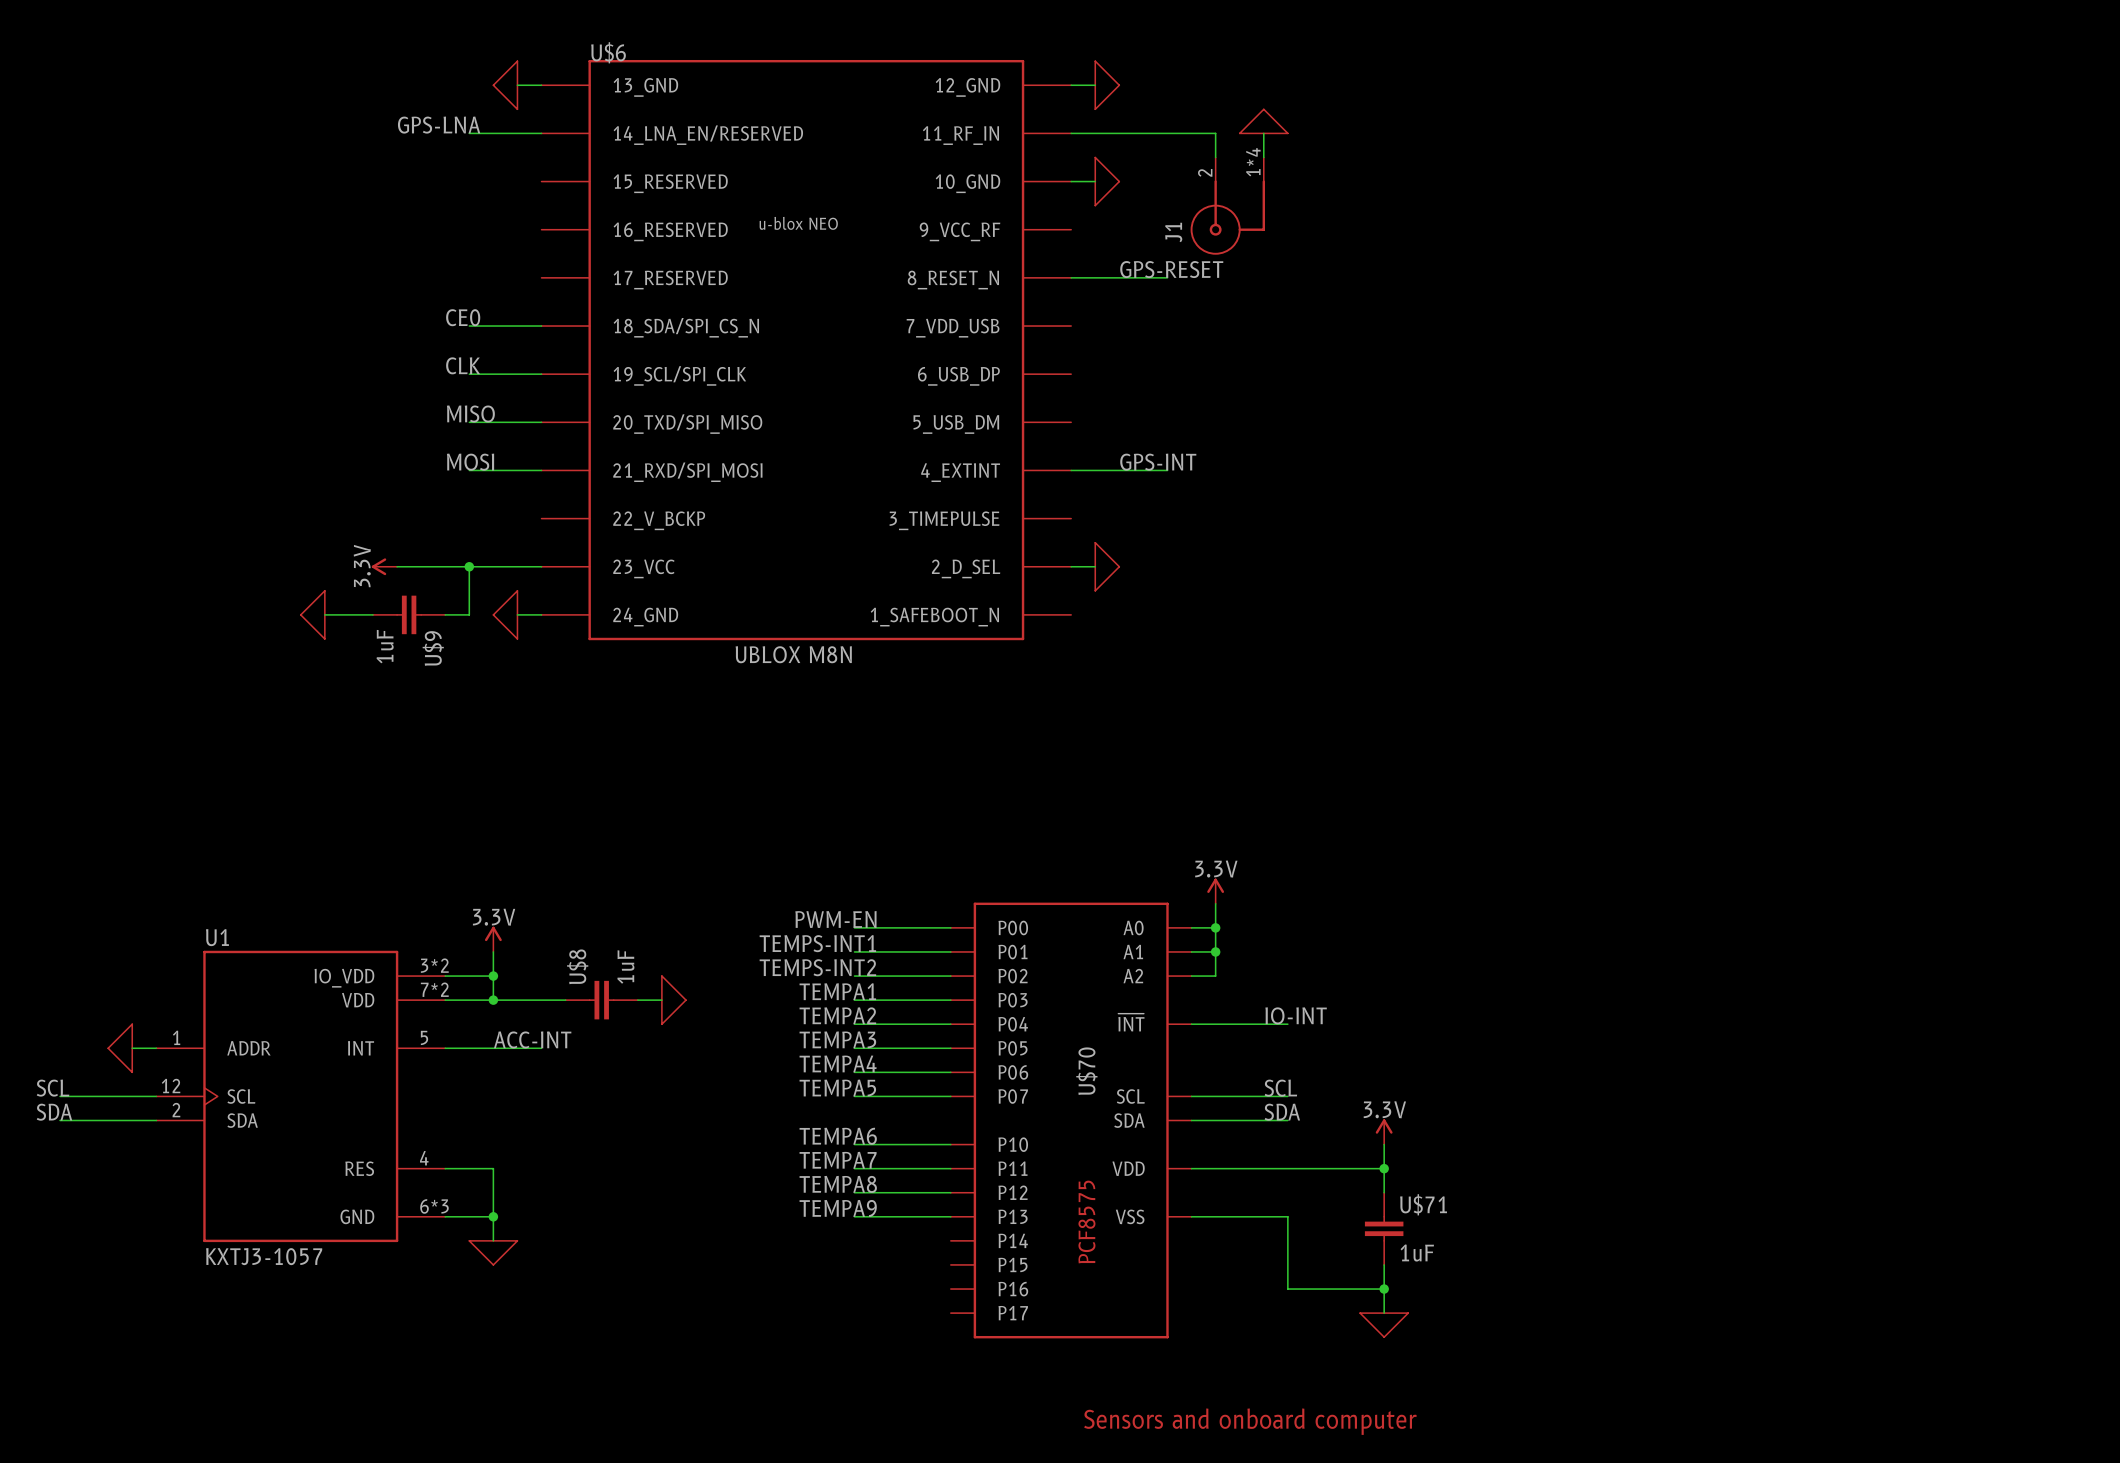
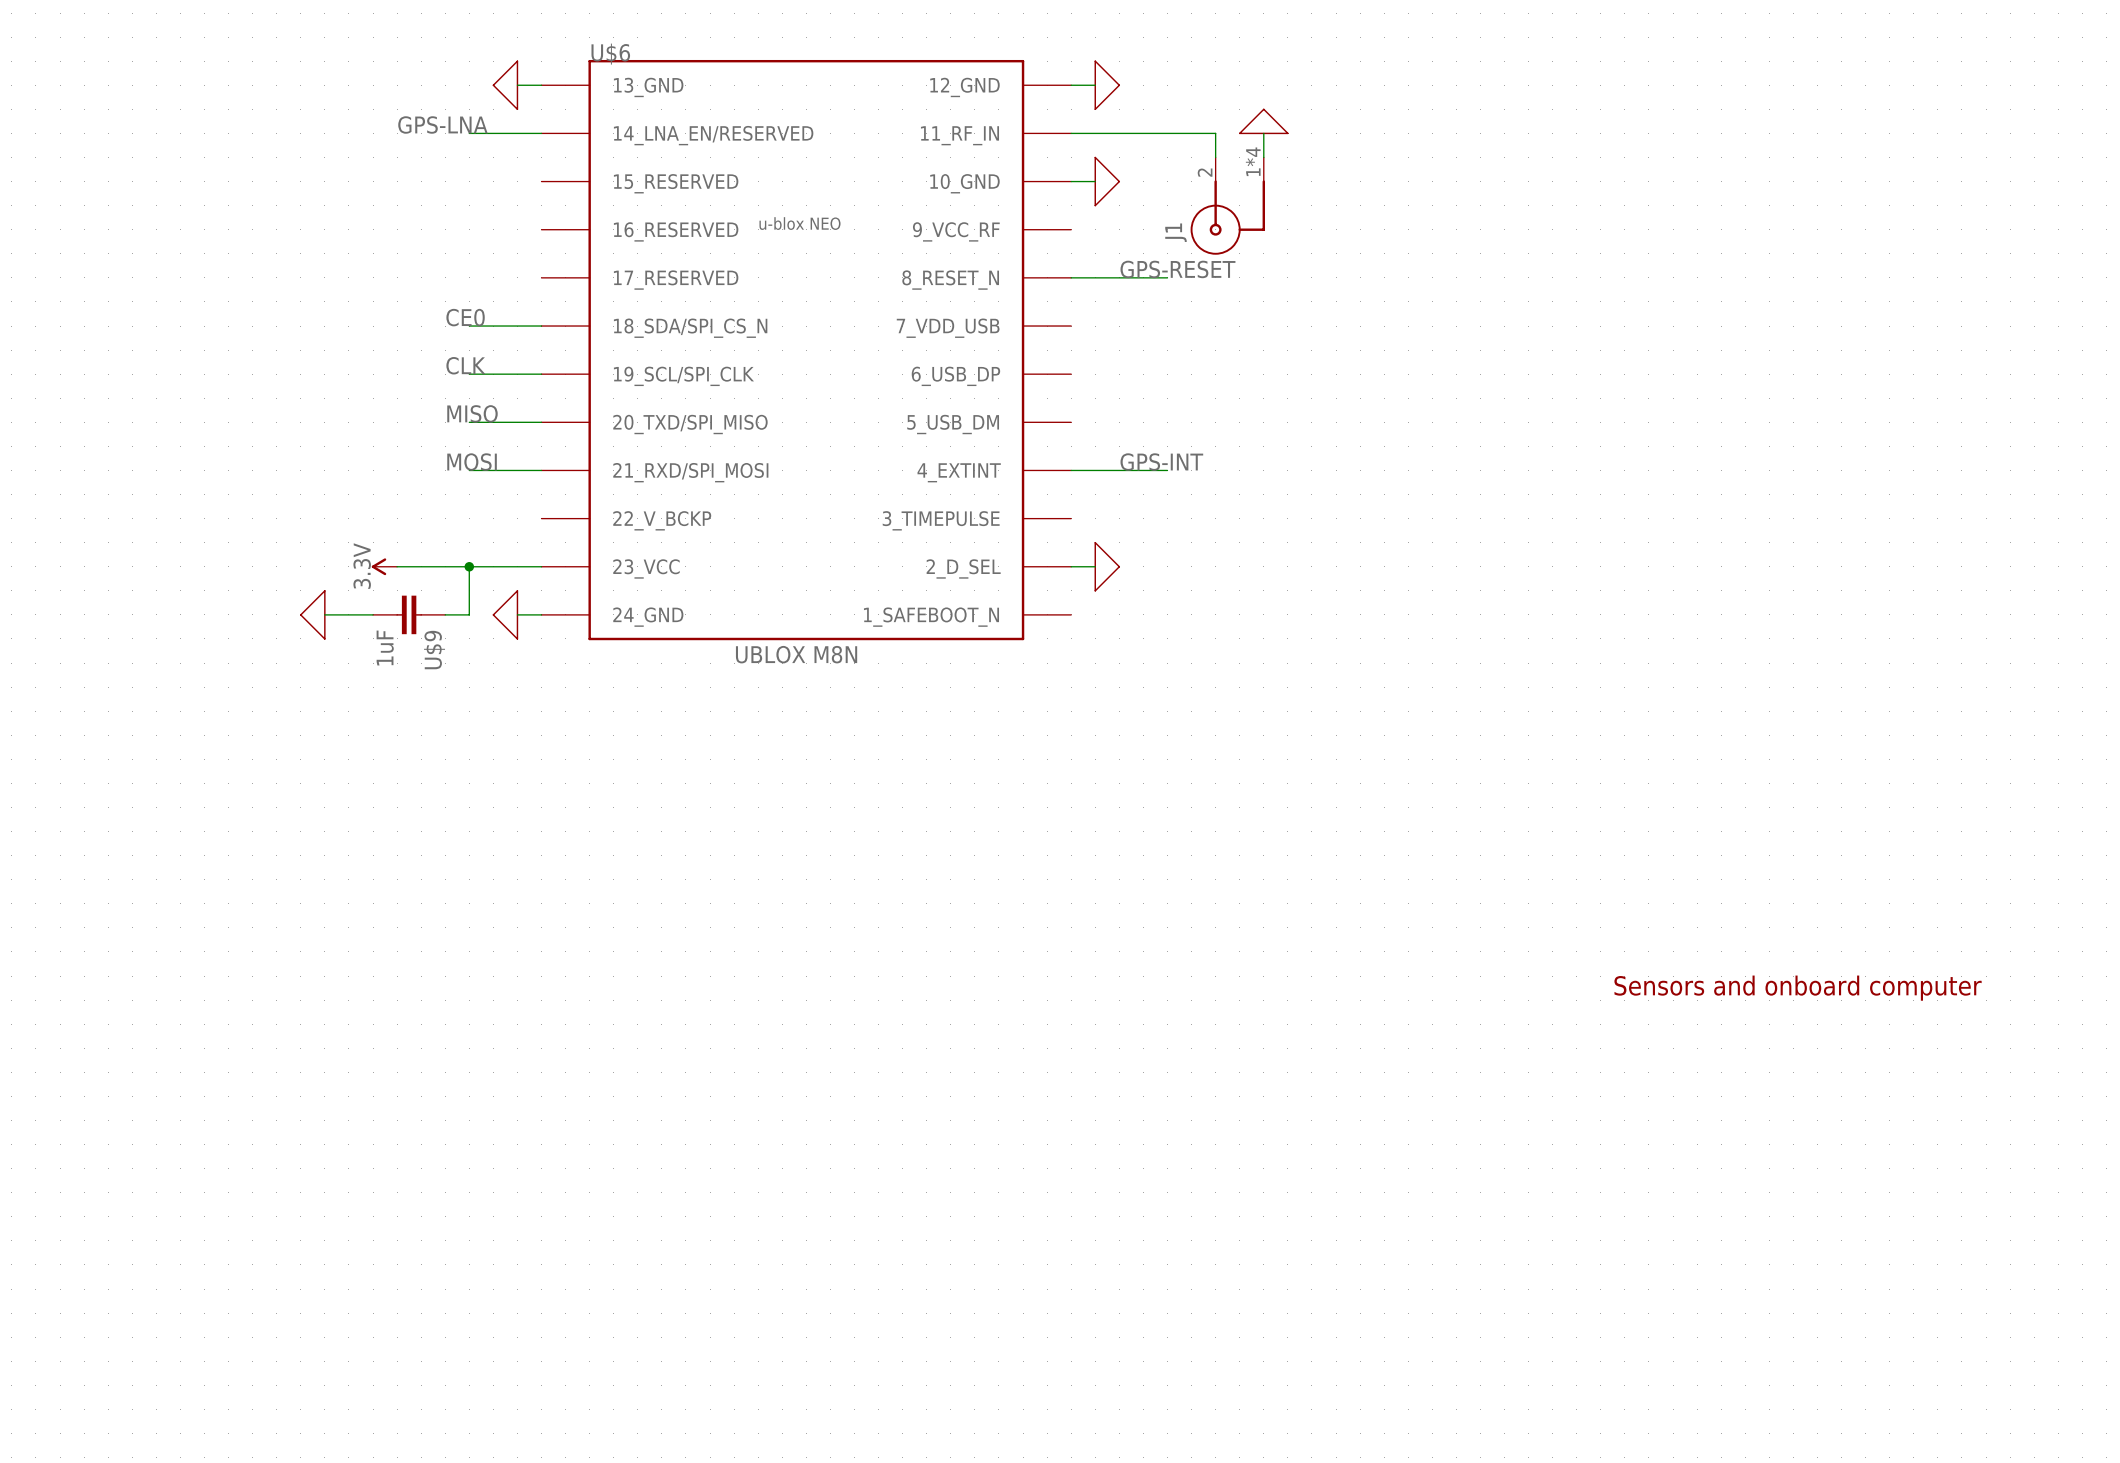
power symbol: 3.3V (1215, 891) -> none
wire: (1215, 903) (1215, 976) (1191, 976) -> none
label: PWM-EN (835, 919) -> none
wire: (854, 927) (950, 927) -> none
wire: (1191, 927) (1215, 927) -> none
junction: (1215, 927) -> none
power symbol: 3.3V (493, 939) -> none
label: TEMPS-INT1 (817, 943) -> none
wire: (493, 951) (493, 1000) -> none
wire: (854, 951) (950, 951) -> none
wire: (1191, 951) (1215, 951) -> none
junction: (1215, 951) -> none
label: TEMPS-INT2 (817, 967) -> none
wire: (445, 976) (493, 976) -> none
junction: (493, 976) -> none
wire: (854, 976) (950, 976) -> none
text: none -> Sensors and onboard computer (1798, 988)
label: TEMPA1 (837, 991) -> none
wire: (445, 1000) (565, 1000) -> none
junction: (493, 1000) -> none
U$8: 1uF (601, 1000) -> none
wire: (637, 1000) (661, 1000) -> none
power symbol: (673, 1000) -> none
wire: (854, 1000) (950, 1000) -> none
label: TEMPA2 (837, 1015) -> none
label: IO-INT (1296, 1015) -> none
wire: (854, 1024) (950, 1024) -> none
wire: (1191, 1024) (1287, 1024) -> none
label: ACC-INT (532, 1039) -> none
label: TEMPA3 (837, 1039) -> none
power symbol: (120, 1048) -> none
wire: (132, 1048) (156, 1048) -> none
wire: (445, 1048) (541, 1048) -> none
wire: (854, 1048) (950, 1048) -> none
label: TEMPA4 (838, 1063) -> none
wire: (854, 1072) (950, 1072) -> none
label: SCL (53, 1088) -> none
label: TEMPA5 (837, 1088) -> none
label: SCL (1280, 1088) -> none
wire: (60, 1096) (156, 1096) -> none
U1: KXTJ3-1057 (300, 1096) -> none
wire: (854, 1096) (950, 1096) -> none
wire: (1191, 1096) (1287, 1096) -> none
label: SDA (54, 1112) -> none
label: SDA (1282, 1112) -> none
wire: (60, 1120) (156, 1120) -> none
U$70: (1071, 1120) -> none
wire: (1191, 1120) (1287, 1120) -> none
power symbol: 3.3V (1384, 1131) -> none
label: TEMPA6 (838, 1136) -> none
wire: (854, 1144) (950, 1144) -> none
wire: (1384, 1144) (1384, 1192) -> none
label: TEMPA7 (838, 1160) -> none
wire: (445, 1168) (493, 1168) (493, 1240) -> none
wire: (854, 1168) (950, 1168) -> none
wire: (1191, 1168) (1384, 1168) -> none
junction: (1384, 1168) -> none
label: TEMPA8 (838, 1184) -> none
wire: (854, 1192) (950, 1192) -> none
label: TEMPA9 (838, 1208) -> none
wire: (445, 1216) (493, 1216) -> none
junction: (493, 1216) -> none
wire: (854, 1216) (950, 1216) -> none
wire: (1191, 1216) (1287, 1216) (1287, 1289) (1384, 1289) -> none
U$71: 1uF (1384, 1228) -> none
power symbol: (493, 1252) -> none
wire: (1384, 1264) (1384, 1313) -> none
junction: (1384, 1289) -> none
power symbol: (1384, 1325) -> none
text: Sensors and onboard computer (1250, 1421) -> none

